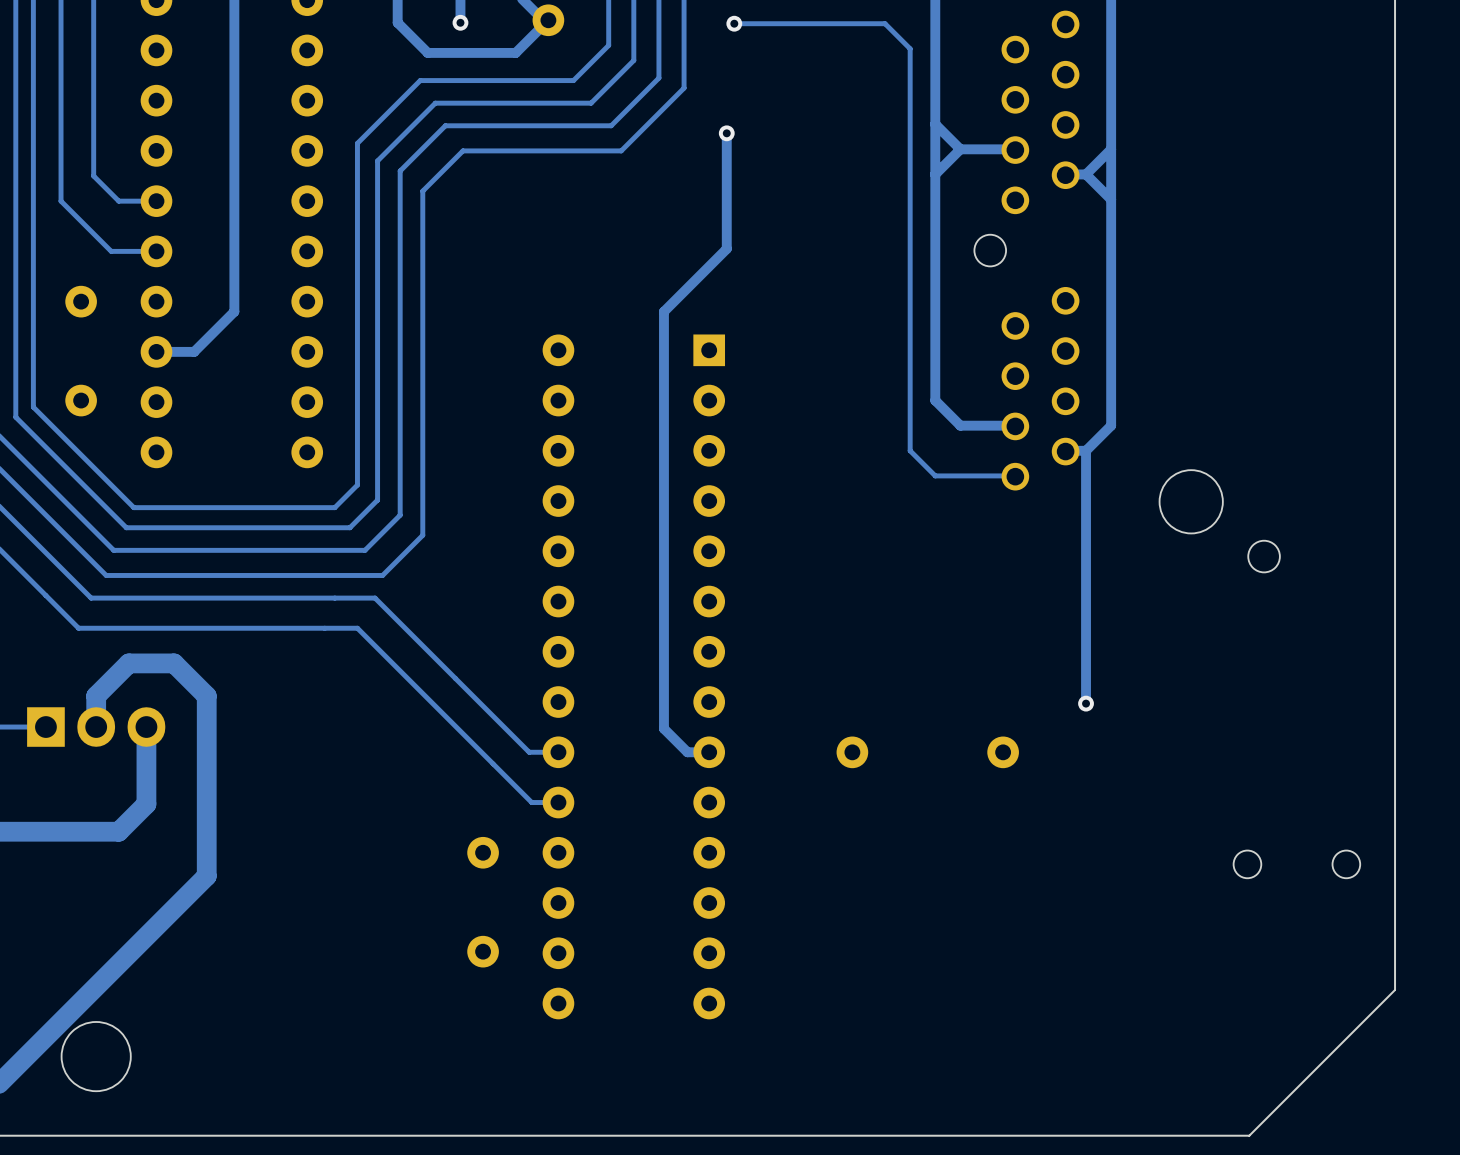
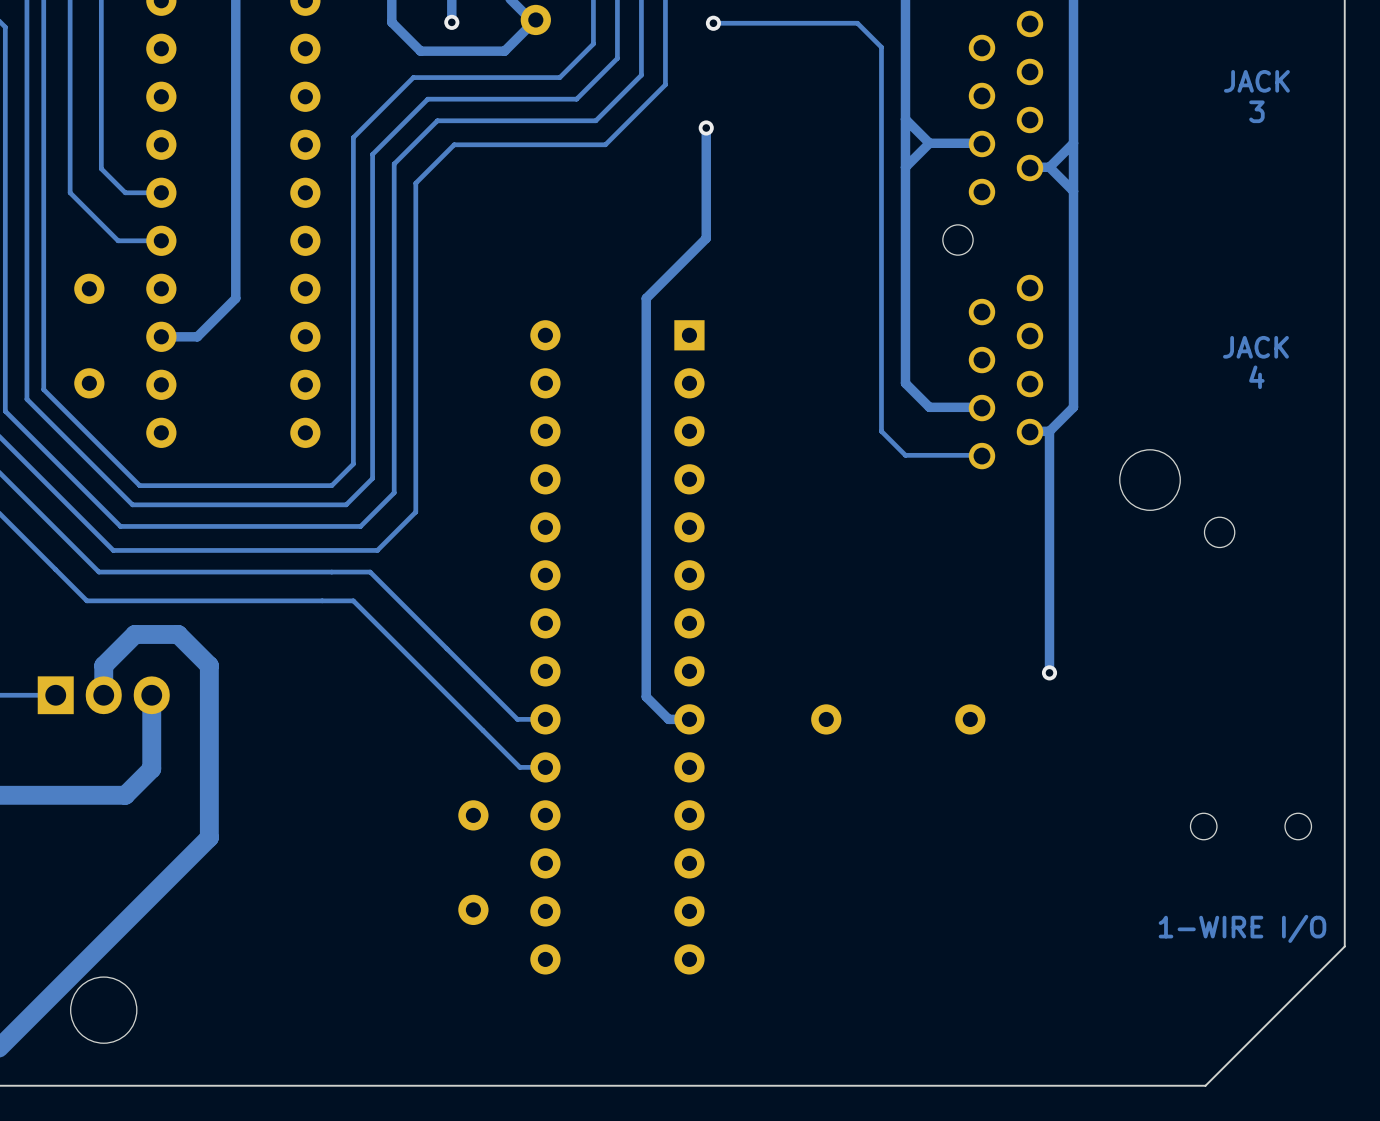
text: none -> JACK (1256, 81)
text: none -> 3 (1256, 111)
text: none -> JACK (1255, 347)
text: none -> 4 (1256, 377)
text: none -> 1-WIRE I/O (1242, 928)

